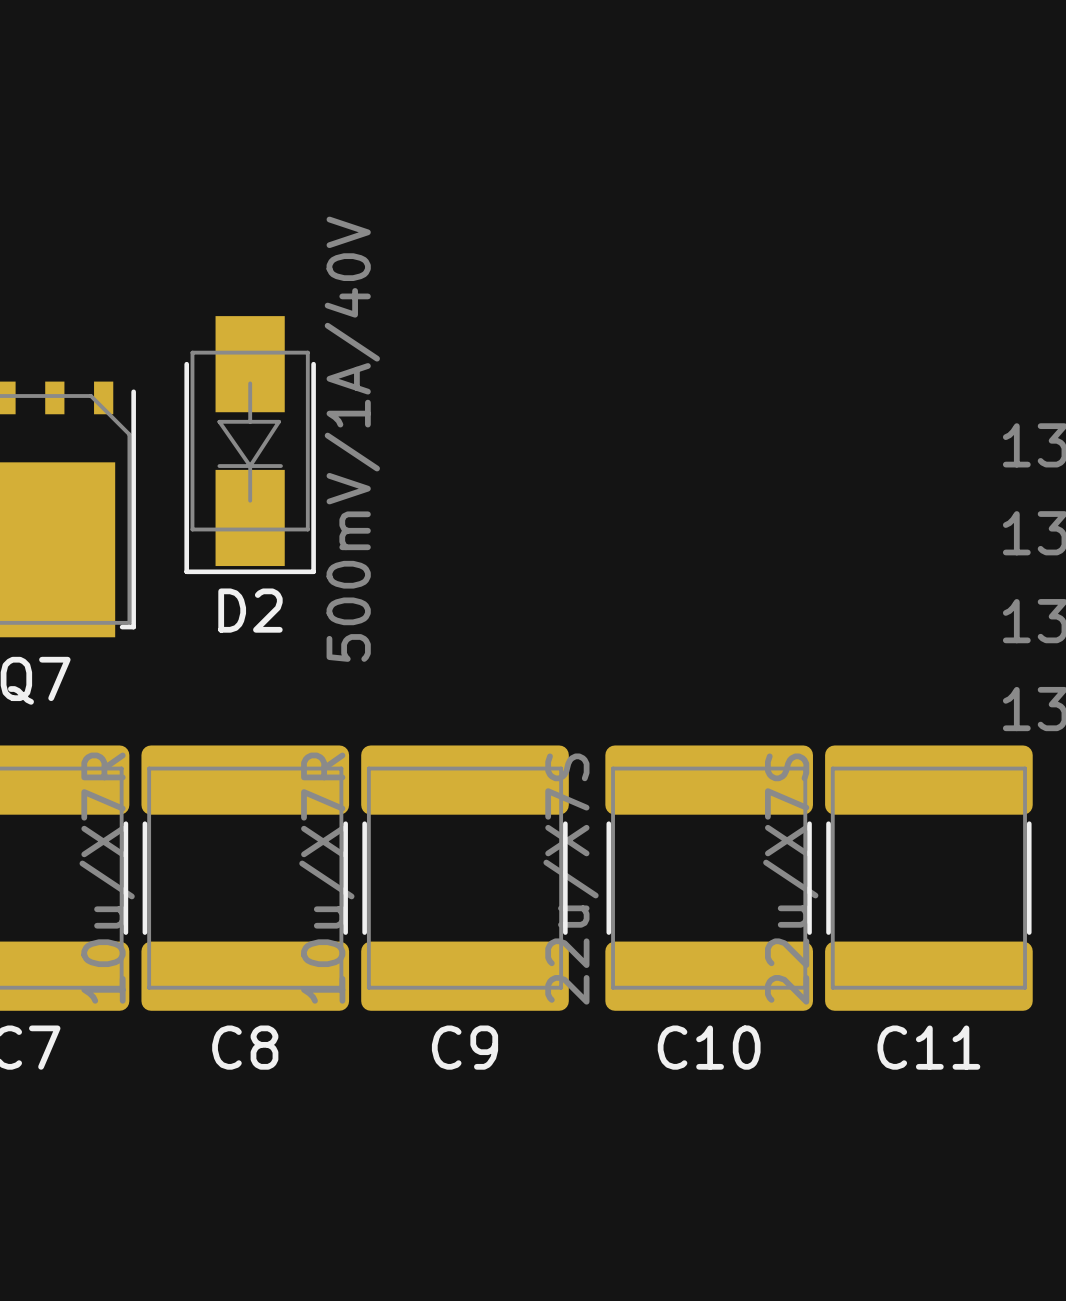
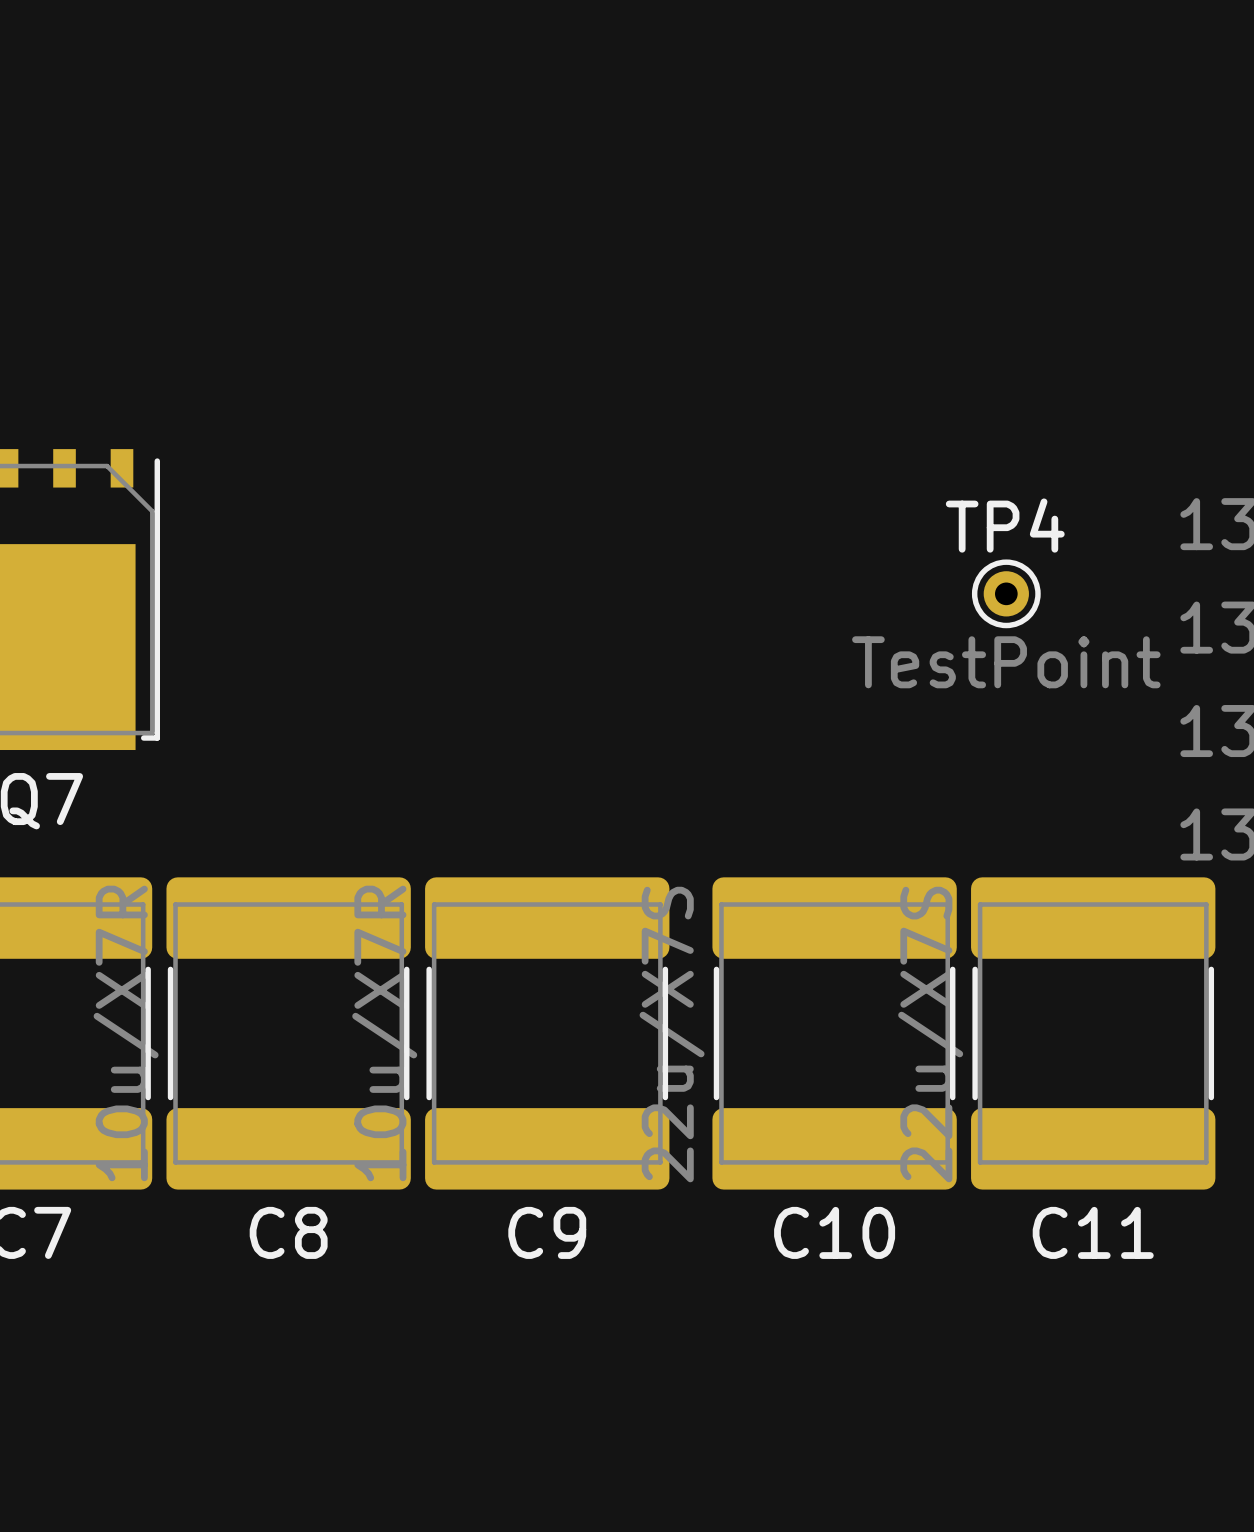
D2: 500mV/1A/40V (250, 445) -> none
TP4: none -> TestPoint (1006, 593)

